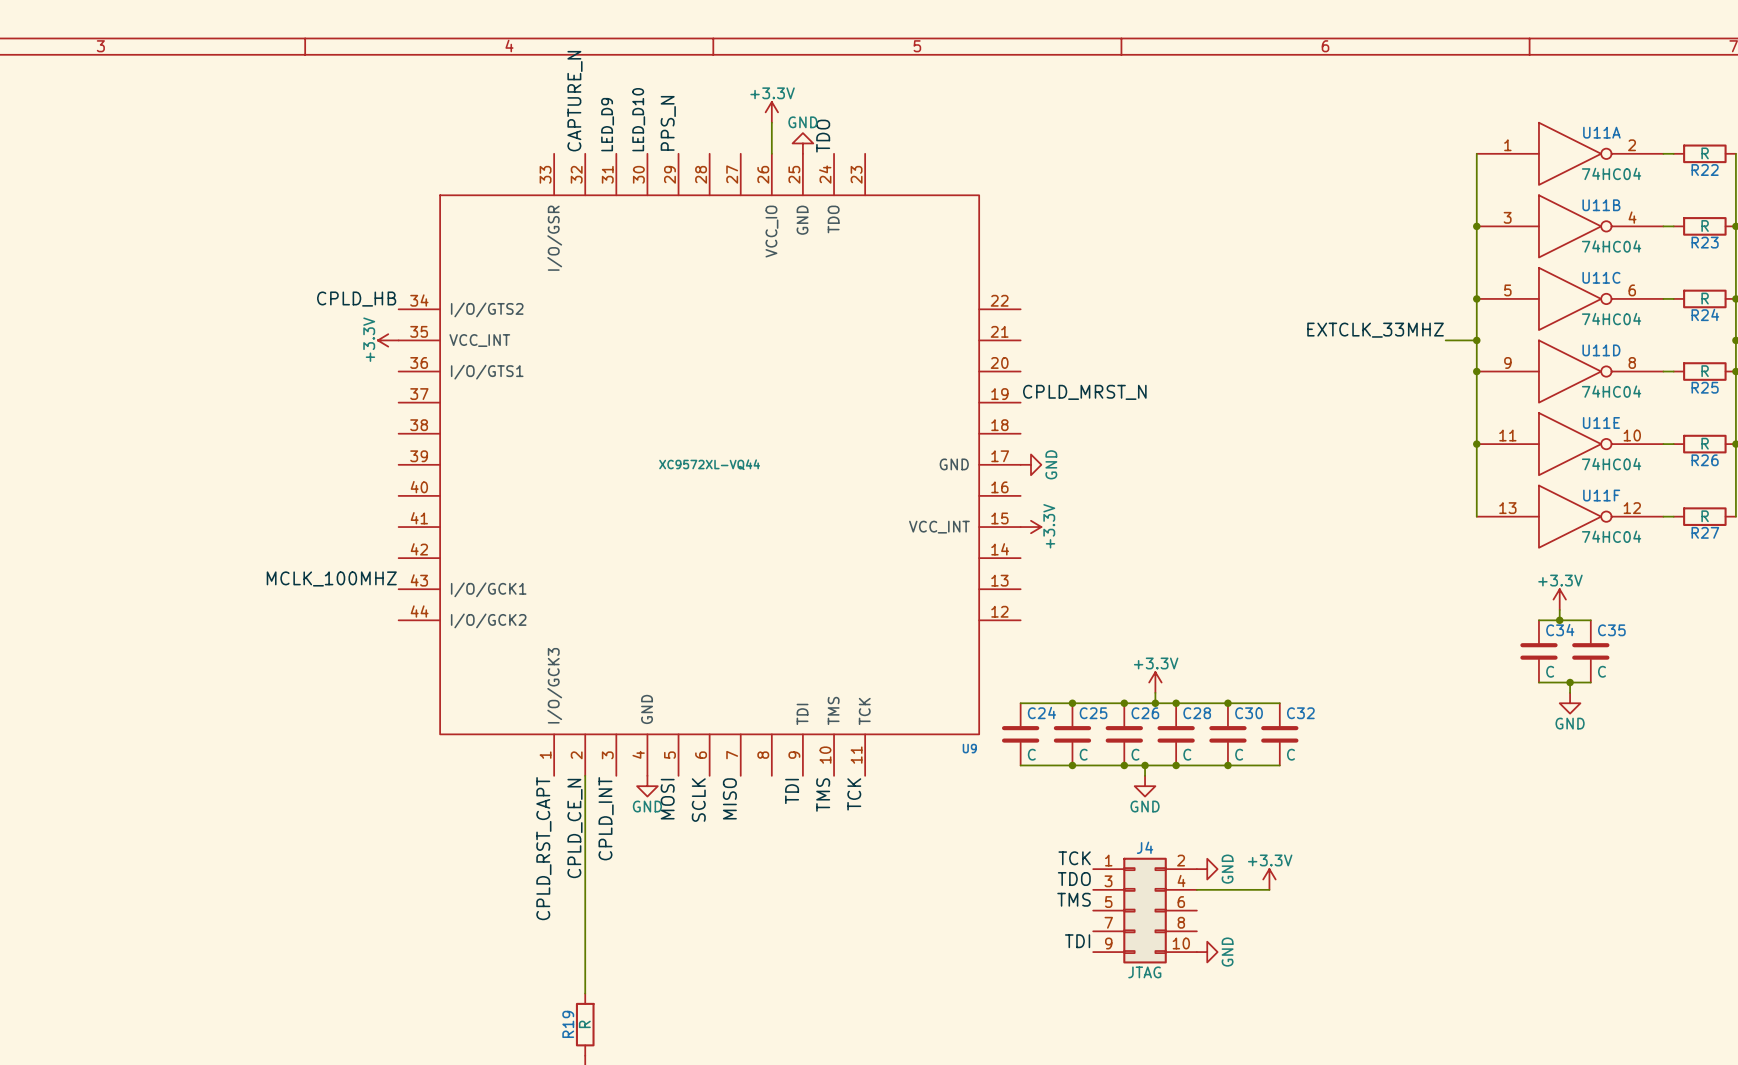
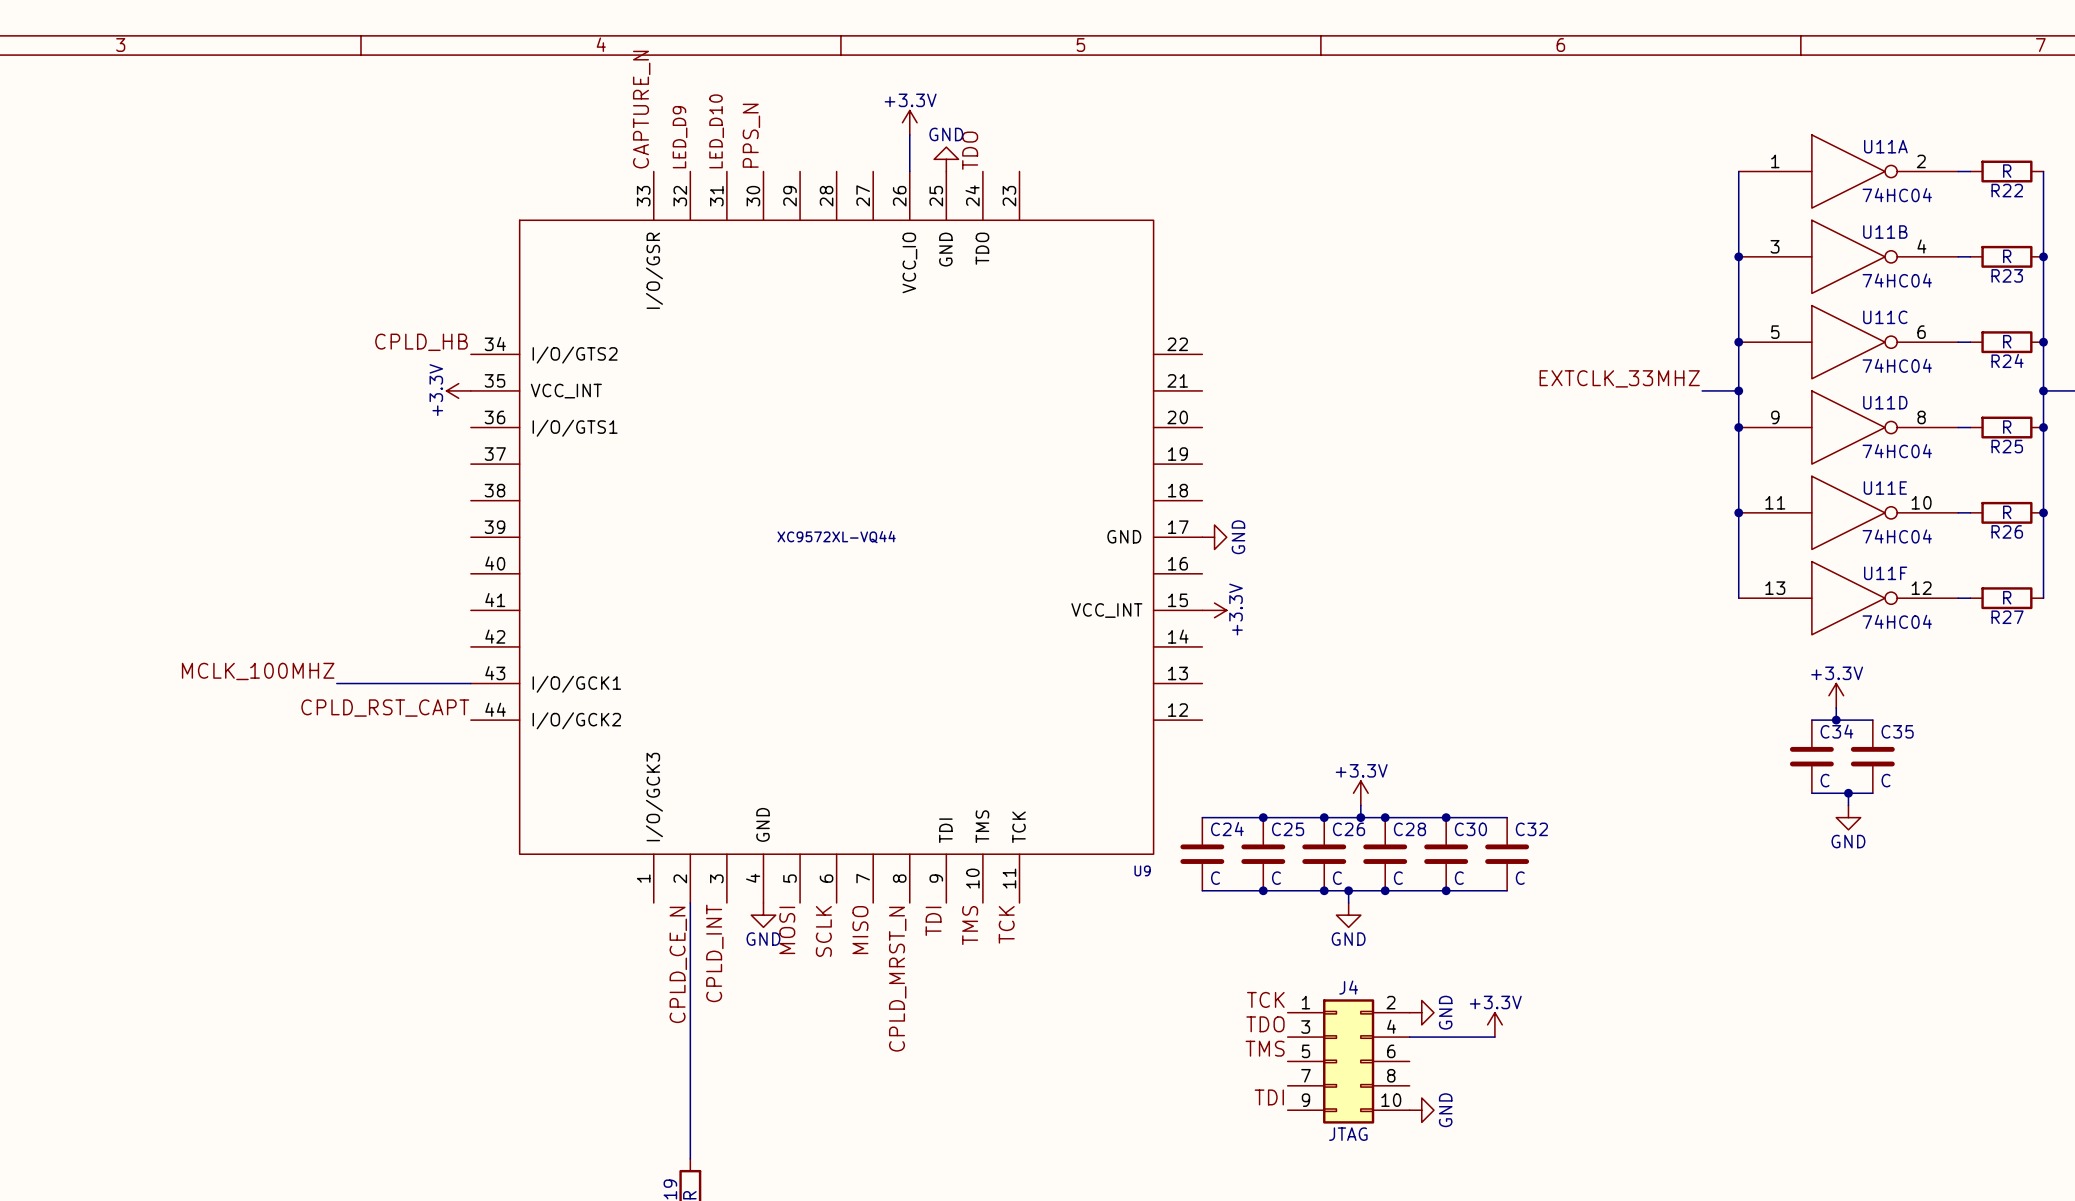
label: none -> CAPTURE_N (641, 109)
label: CAPTURE_N (574, 101) -> LED_D9 (680, 137)
label: LED_D10 (638, 119) -> PPS_N (751, 135)
label: PPS_N (668, 123) -> none
label: LED_D9 (607, 124) -> LED_D10 (716, 131)
label: CPLD_MRST_N (1084, 392) -> none
label position: MCLK_100MHZ (331, 578) -> MCLK_100MHZ (258, 671)
wire: none -> (336, 683) (470, 683)
label: none -> CPLD_RST_CAPT (385, 708)
label: none -> CPLD_MRST_N (897, 979)
label: CPLD_RST_CAPT (543, 848) -> none

